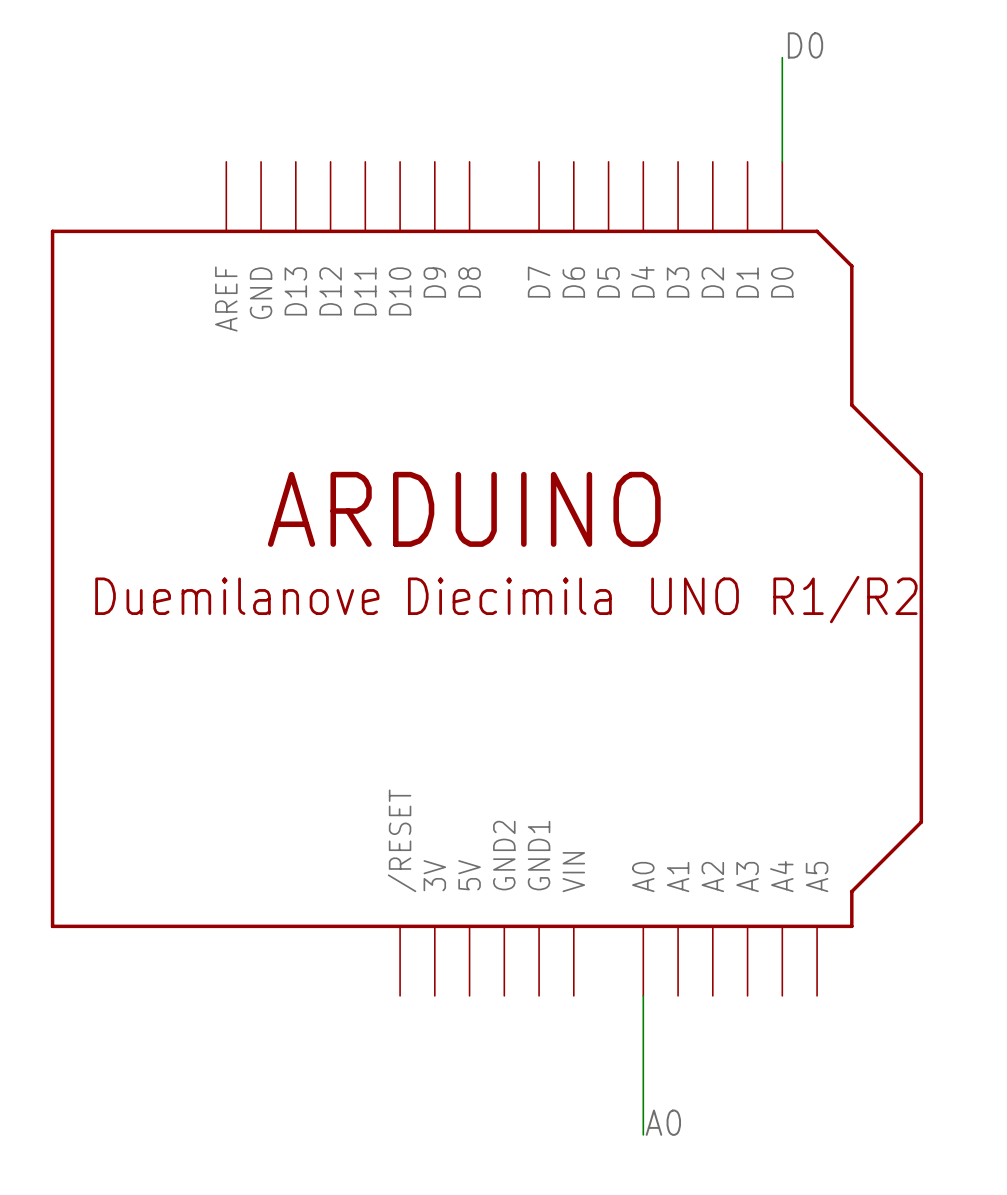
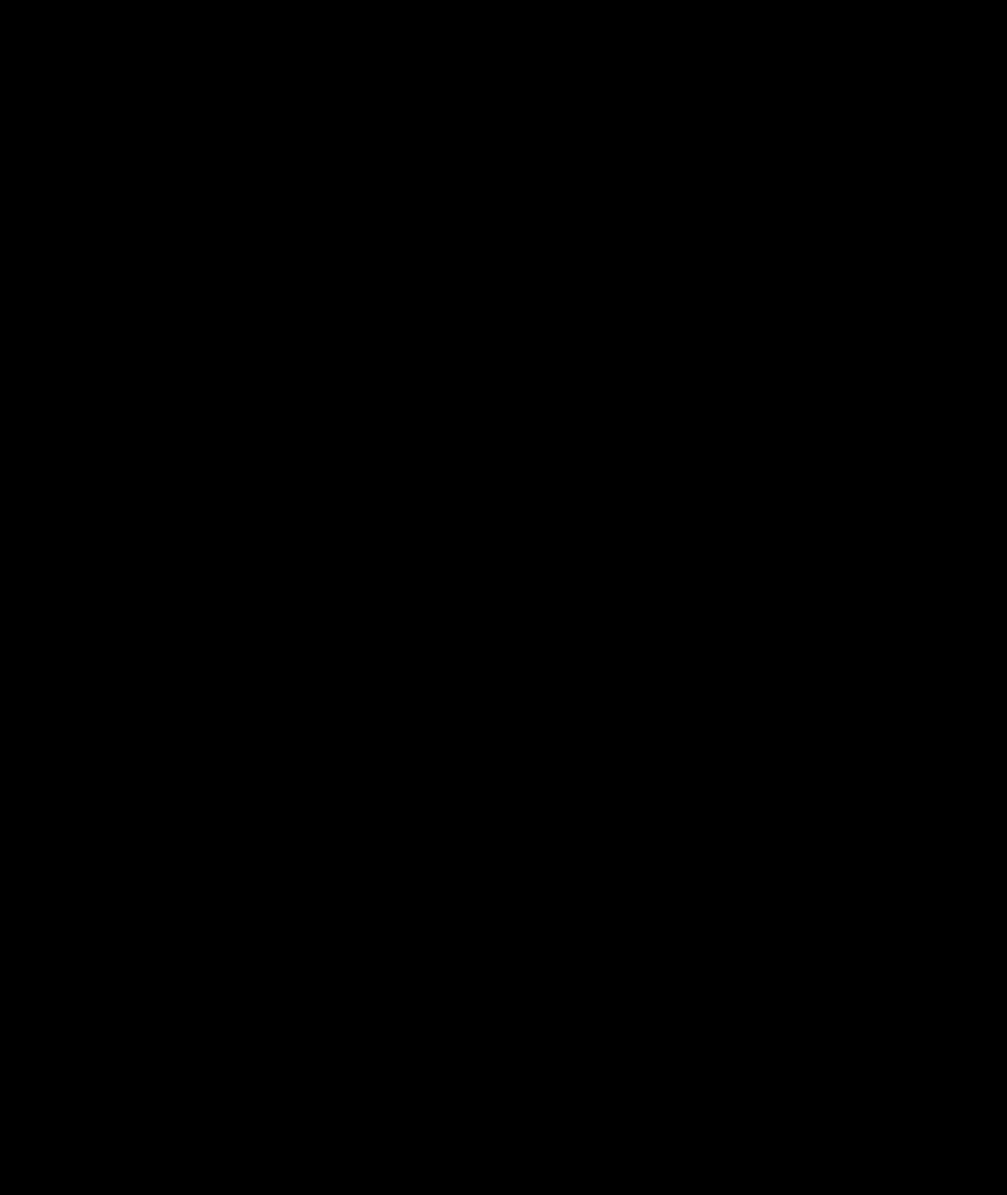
label: D0 (805, 45) -> none
wire: (782, 57) (782, 161) -> none
part: (486, 578) -> none
wire: (643, 995) (643, 1134) -> none
label: A0 (663, 1122) -> none

